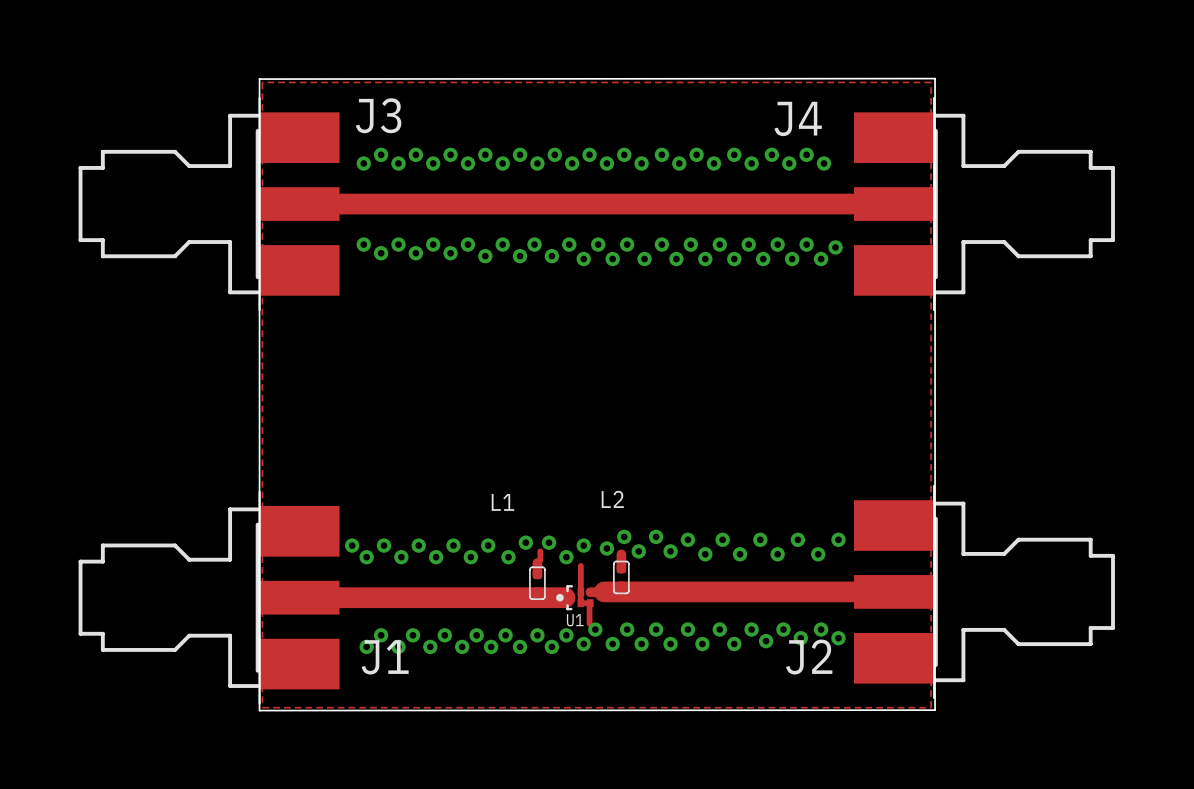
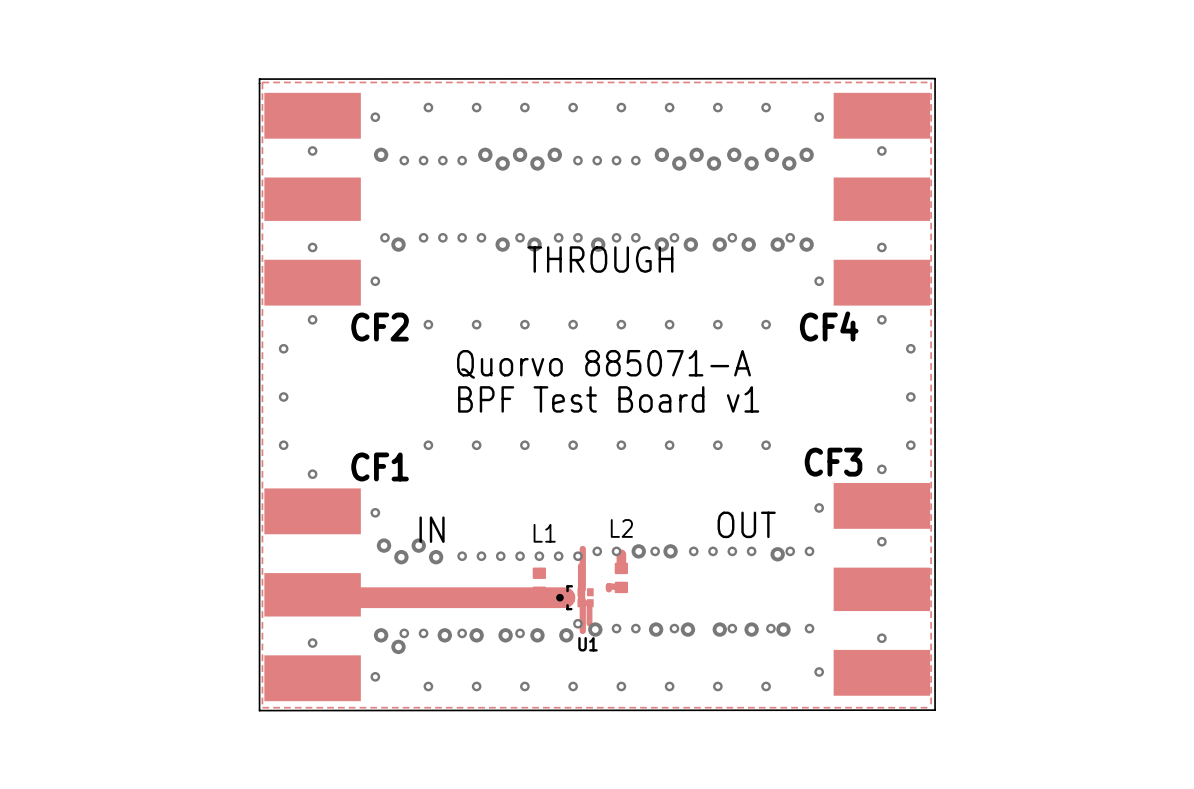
via: none -> (428, 107)
via: none -> (476, 107)
via: none -> (524, 107)
via: none -> (573, 107)
via: none -> (621, 107)
via: none -> (669, 107)
via: none -> (717, 107)
via: none -> (766, 107)
via: none -> (375, 117)
via: none -> (819, 117)
via: none -> (312, 150)
via: none -> (881, 150)
via: (415, 154) -> none
via: (450, 154) -> none
via: (589, 154) -> none
via: (624, 154) -> none
via: none -> (404, 160)
via: none -> (423, 160)
via: none -> (442, 160)
via: none -> (462, 160)
via: none -> (577, 160)
via: none -> (597, 160)
via: none -> (616, 160)
via: none -> (635, 160)
via: (363, 163) -> none
via: (398, 163) -> none
via: (433, 163) -> none
via: (467, 163) -> none
via: (572, 163) -> none
via: (606, 163) -> none
via: (641, 163) -> none
via: (823, 163) -> none
CF2: none -> (312, 199)
CF4: none -> (881, 199)
J3: (209, 204) -> none
track: (299, 204) (893, 204) -> none
J4: (984, 204) -> none
via: none -> (384, 237)
via: none -> (423, 237)
via: none -> (442, 237)
via size: [460, 237, 476, 252] -> [457, 232, 467, 243]
via: none -> (481, 237)
via: none -> (520, 237)
via: none -> (558, 237)
via: none -> (577, 237)
via: none -> (616, 237)
via: none -> (635, 237)
via: none -> (674, 237)
via: none -> (732, 237)
via: none -> (790, 237)
via: (363, 244) -> none
via: (433, 244) -> none
via: (569, 244) -> none
via: (627, 244) -> none
via: none -> (312, 247)
via: (835, 247) -> none
via: none -> (881, 247)
via: (381, 253) -> none
via: (415, 253) -> none
via: (450, 253) -> none
via: (485, 256) -> none
via: (520, 256) -> none
via: (551, 256) -> none
via: (583, 259) -> none
text: none -> THROUGH (600, 259)
via: (612, 259) -> none
via: (644, 259) -> none
via: (676, 259) -> none
via: (705, 259) -> none
via: (734, 259) -> none
via: (763, 259) -> none
via: (792, 259) -> none
via: (821, 259) -> none
via: none -> (375, 281)
via: none -> (819, 281)
via: none -> (312, 319)
via: none -> (881, 319)
via: none -> (428, 324)
via: none -> (476, 324)
via: none -> (524, 324)
via: none -> (573, 324)
via: none -> (621, 324)
via: none -> (669, 324)
via: none -> (717, 324)
via: none -> (766, 324)
via: none -> (283, 348)
via: none -> (910, 348)
text: none -> Quorvo 885071-A (604, 364)
via: none -> (283, 397)
via: none -> (910, 397)
text: none -> BPF Test Board v1 (608, 399)
via: none -> (283, 445)
via: none -> (428, 445)
via: none -> (476, 445)
via: none -> (524, 445)
via: none -> (573, 445)
via: none -> (621, 445)
via: none -> (669, 445)
via: none -> (717, 445)
via: none -> (766, 445)
via: none -> (910, 445)
via: none -> (881, 469)
via: none -> (312, 474)
L1 name position: L1 (502, 502) -> L1 (544, 533)
via: none -> (819, 507)
via: none -> (375, 512)
text: none -> OUT (746, 524)
text: none -> IN (432, 529)
via: (624, 536) -> none
via: (656, 536) -> none
via: (687, 539) -> none
via: (722, 539) -> none
via: (760, 539) -> none
via: (797, 539) -> none
via: (838, 539) -> none
via: none -> (881, 541)
via: (525, 542) -> none
via: (549, 542) -> none
via: (352, 545) -> none
via: (453, 545) -> none
via: (488, 545) -> none
via: (583, 545) -> none
track: none -> (582, 548) (582, 630)
via: (606, 548) -> none
track: (540, 551) (537, 574) -> none
via: none -> (597, 551)
via: none -> (616, 551)
via: none -> (655, 551)
via: none -> (693, 551)
via: none -> (713, 551)
via: none -> (732, 551)
via: none -> (751, 551)
via: none -> (790, 551)
via: none -> (809, 551)
via: (705, 554) -> none
via: (740, 554) -> none
via: (818, 554) -> none
via: none -> (462, 556)
via: none -> (481, 556)
via: none -> (500, 556)
via: none -> (520, 556)
via: none -> (539, 556)
via: none -> (558, 556)
via: none -> (577, 556)
via: (366, 557) -> none
via: (470, 557) -> none
via: (508, 557) -> none
via: (566, 557) -> none
L2 footprint: [613, 560, 630, 595] -> [614, 562, 629, 594]
L1 footprint: [529, 566, 546, 600] -> [532, 567, 547, 598]
track: (621, 586) (615, 592) (590, 592) (604, 591) (893, 591) -> none
track: none -> (621, 587) (608, 586) (608, 589)
CF3: none -> (881, 589)
J2: (984, 591) -> none
CF1: none -> (312, 594)
J1: (209, 597) -> none
U1 name position: U1 (575, 620) -> U1 (588, 644)
via: none -> (577, 623)
via: none -> (616, 628)
via: none -> (635, 628)
via: none -> (674, 628)
via: none -> (732, 628)
via: none -> (770, 628)
via: none -> (809, 628)
via: (627, 629) -> none
via: (821, 629) -> none
via: none -> (404, 633)
via: none -> (423, 633)
via: none -> (462, 633)
via: none -> (520, 633)
via: (412, 635) -> none
via: (800, 638) -> none
via: (838, 638) -> none
via: none -> (881, 638)
via: (766, 641) -> none
via: none -> (312, 643)
via: (583, 644) -> none
via: (612, 644) -> none
via: (641, 644) -> none
via: (670, 644) -> none
via: (702, 644) -> none
via: (734, 644) -> none
via: (366, 646) -> none
via: (430, 646) -> none
via: (462, 646) -> none
via: (491, 646) -> none
via: (520, 646) -> none
via: (551, 646) -> none
via: none -> (819, 671)
via: none -> (375, 676)
via: none -> (428, 686)
via: none -> (476, 686)
via: none -> (524, 686)
via: none -> (573, 686)
via: none -> (621, 686)
via: none -> (669, 686)
via: none -> (717, 686)
via: none -> (766, 686)

